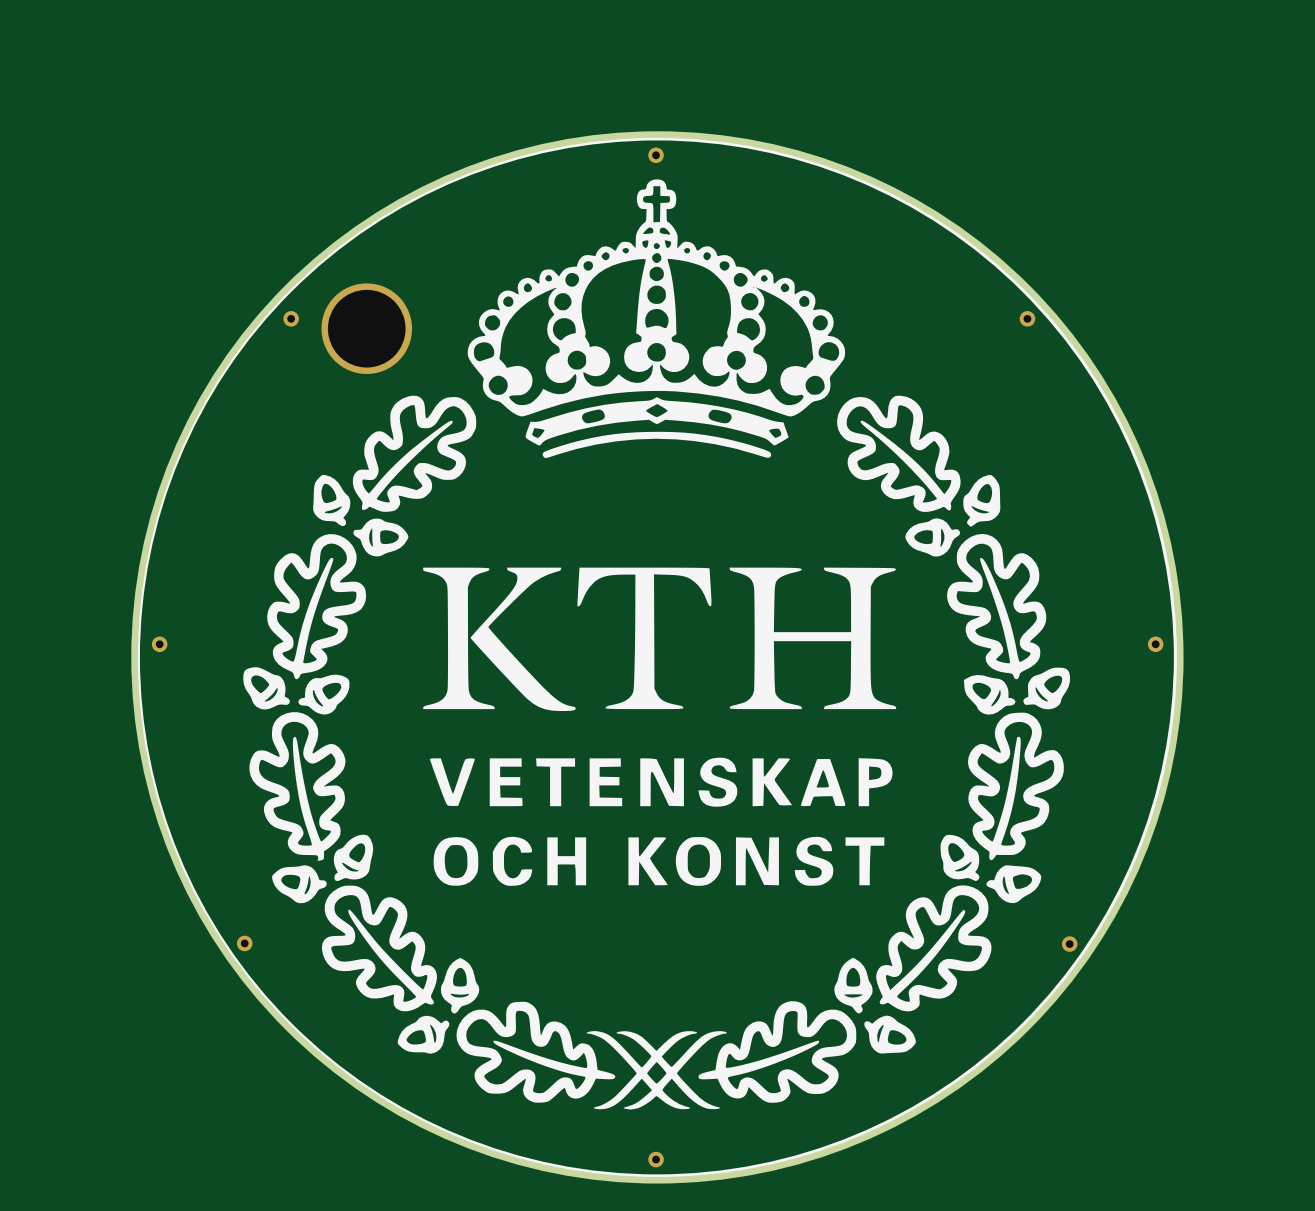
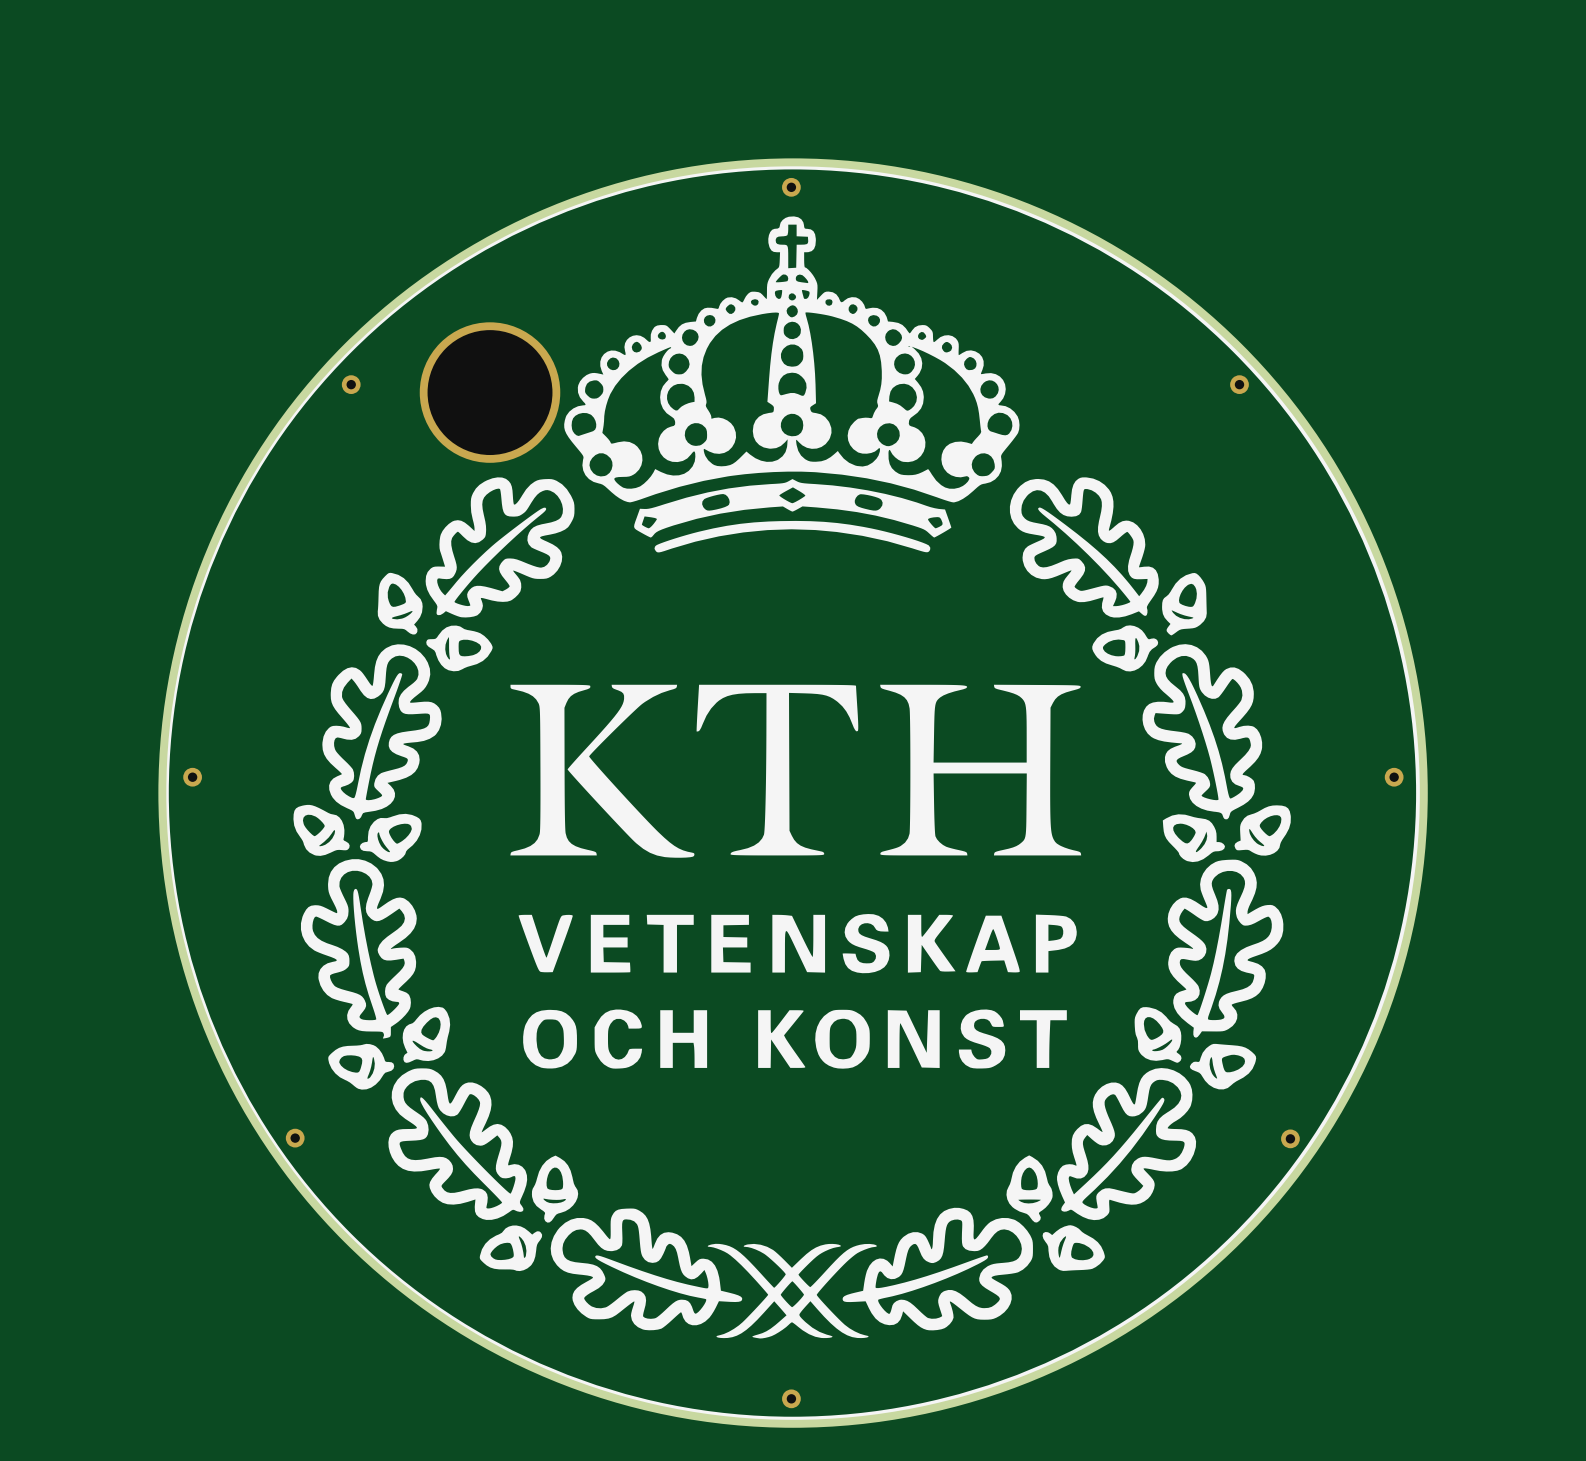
via: none -> (490, 392)
via: (366, 328) -> none

